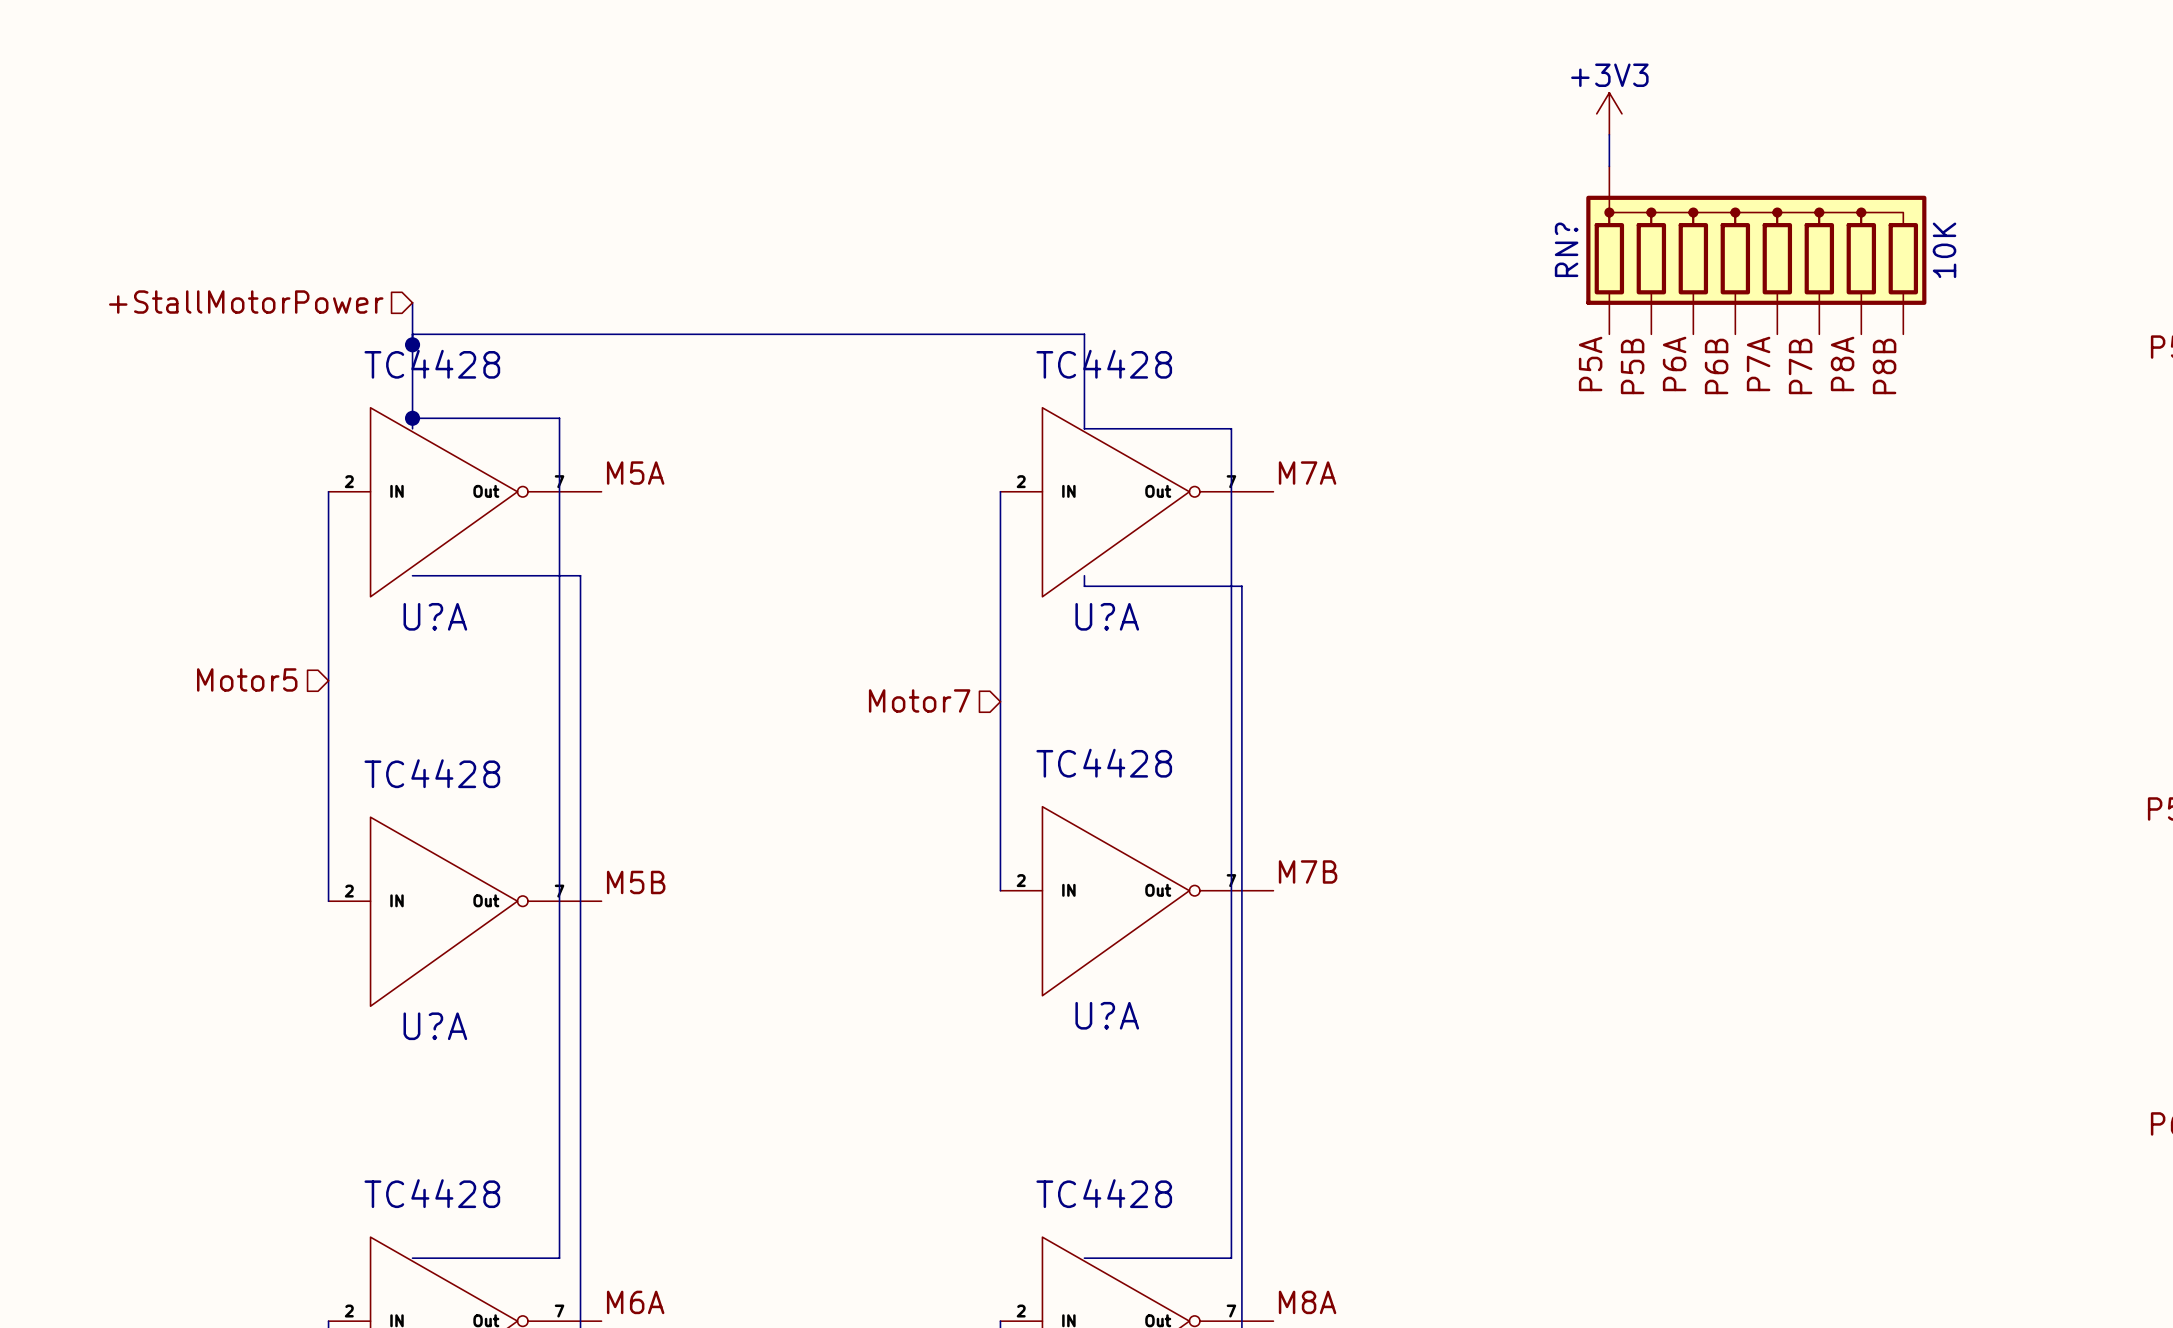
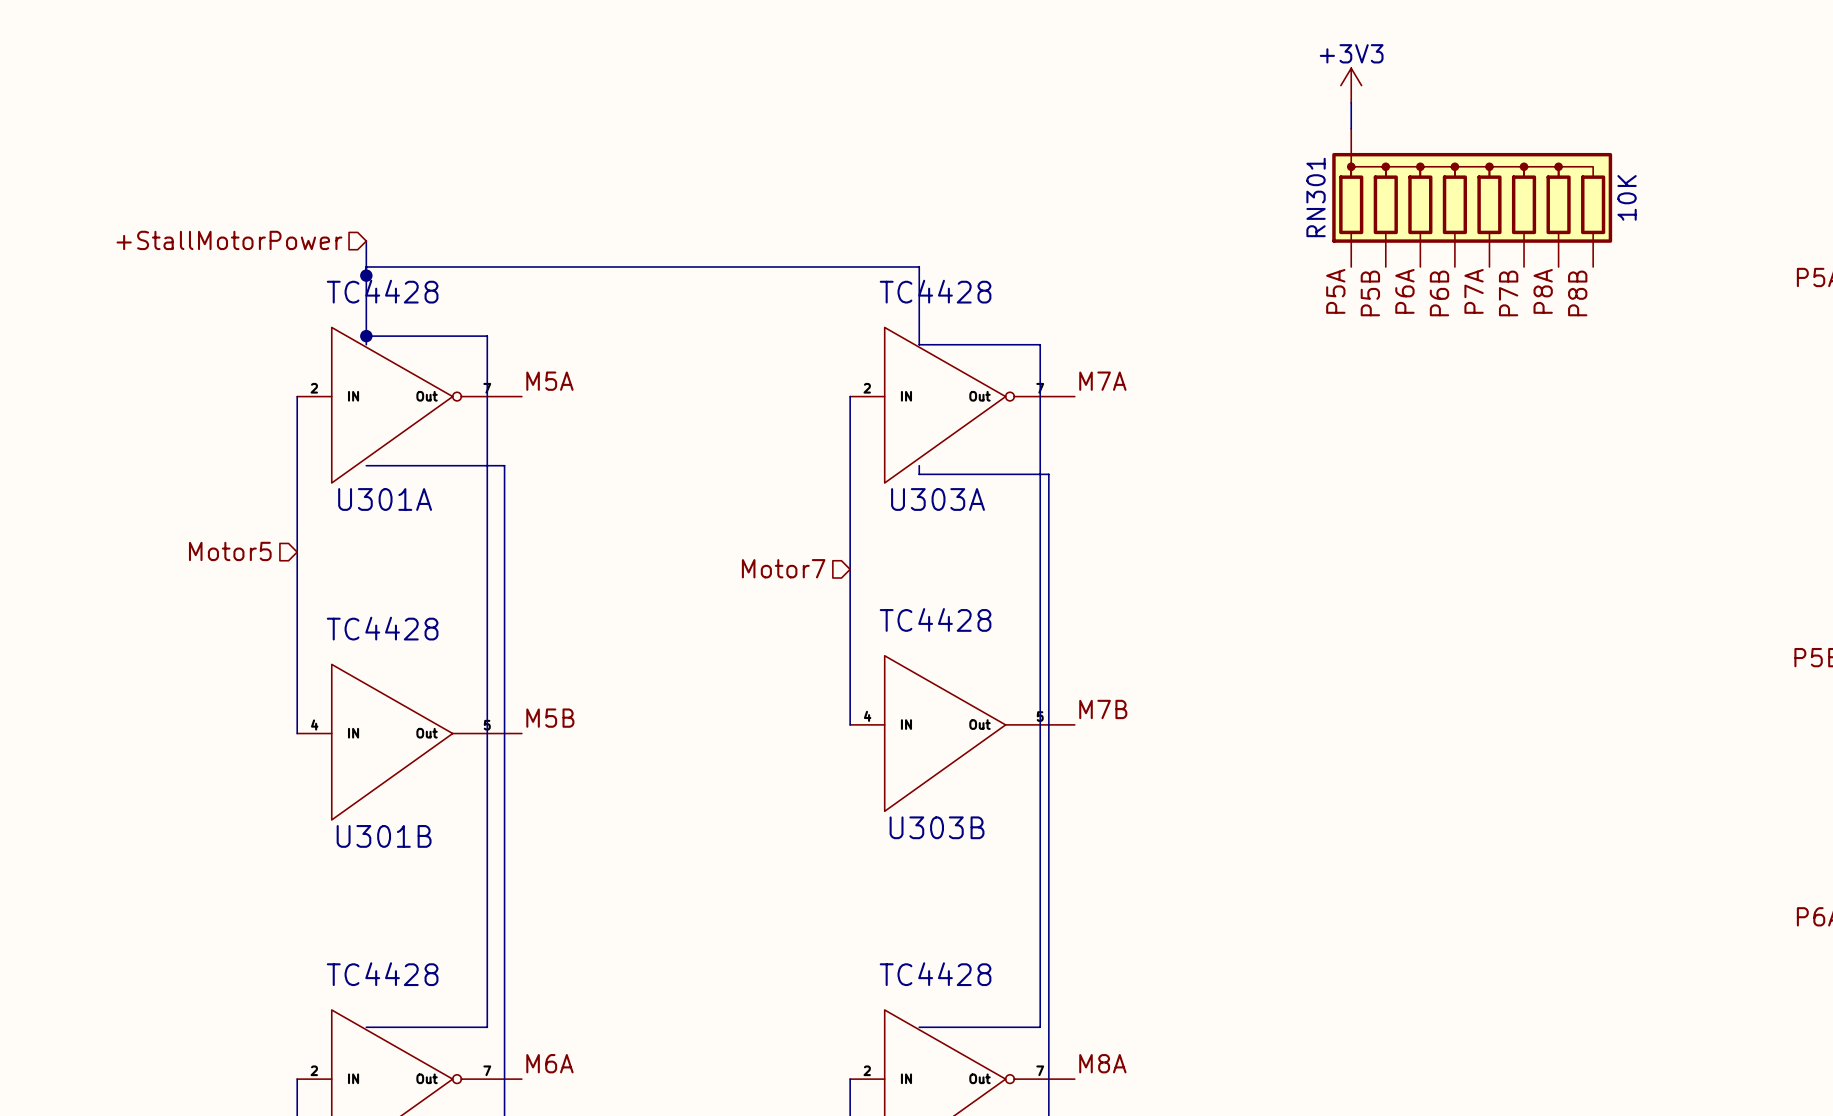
RN? name: RN? (1566, 249) -> RN301 (1316, 197)
U?A name: U?A (435, 616) -> U301A (385, 499)
U?A name: U?A (1107, 616) -> U303A (938, 499)
U?A: TC4428 (1136, 901) -> none
U303B: none -> TC4428 (962, 733)
U?A: TC4428 (465, 911) -> none
U301B: none -> TC4428 (409, 742)

